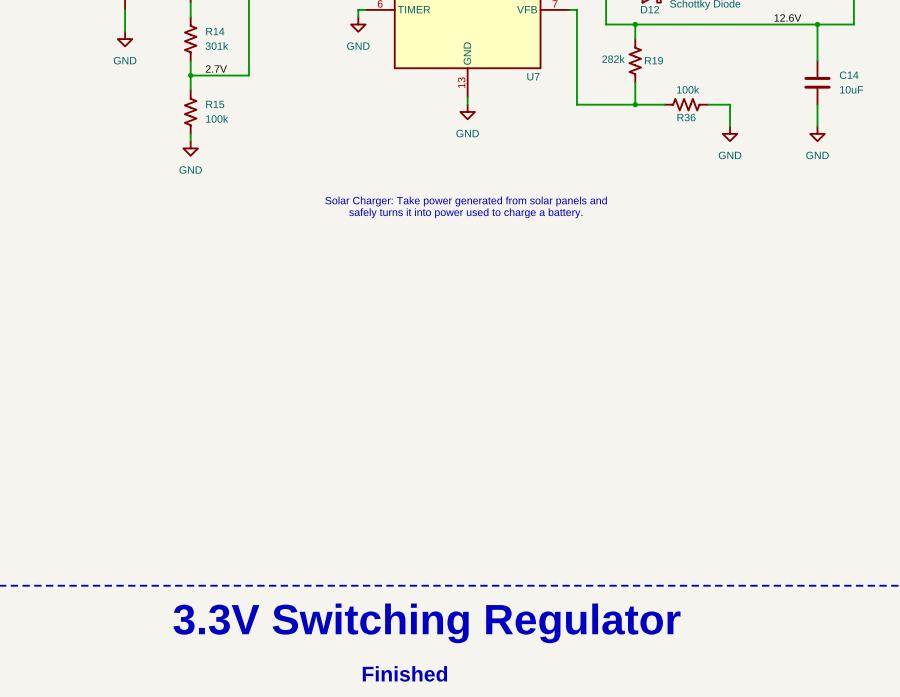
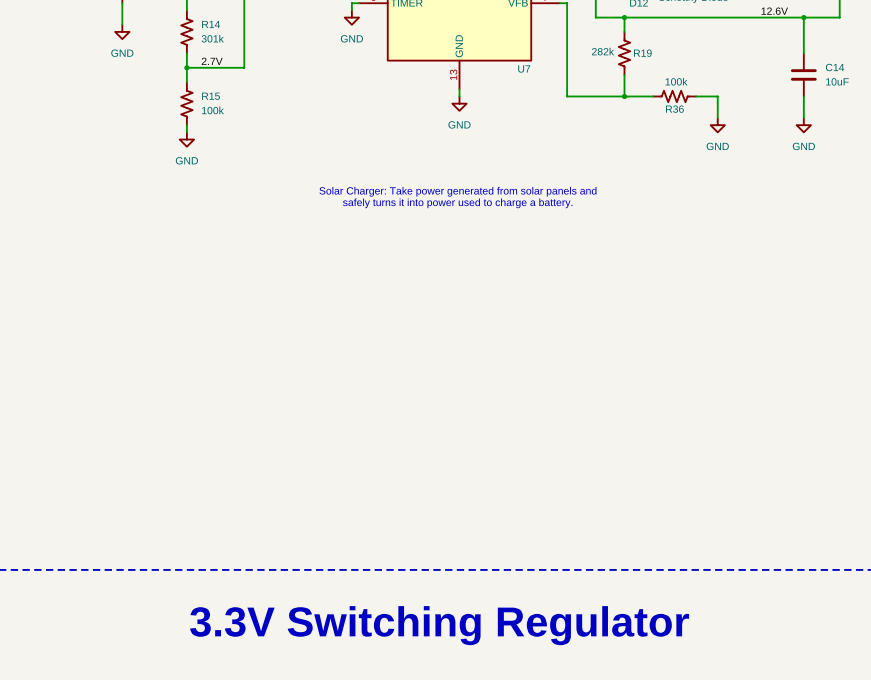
text position: 3.3V Switching Regulator (426, 623) -> 3.3V Switching Regulator (439, 625)
text: Finished (404, 673) -> none

